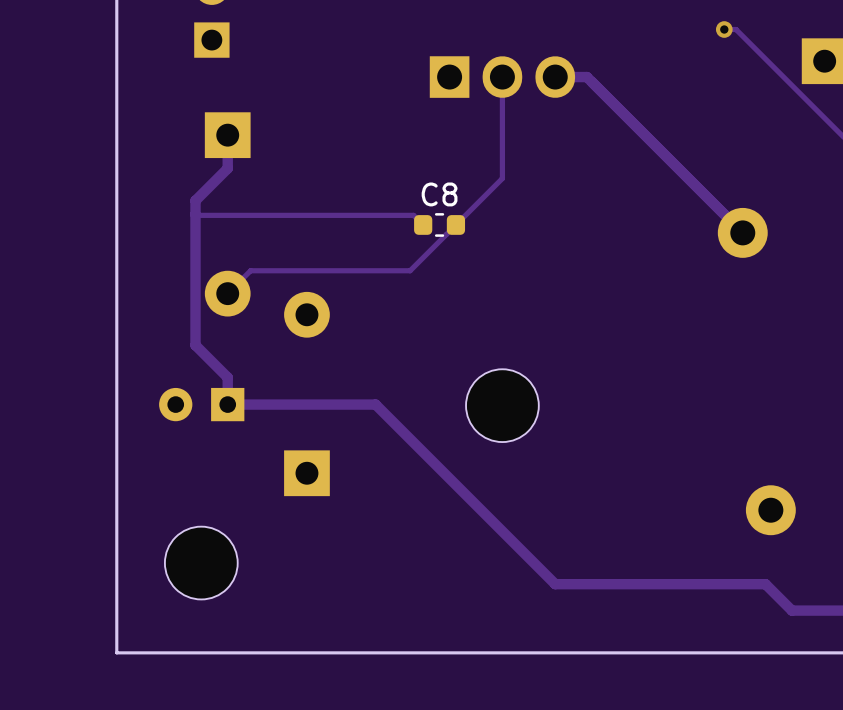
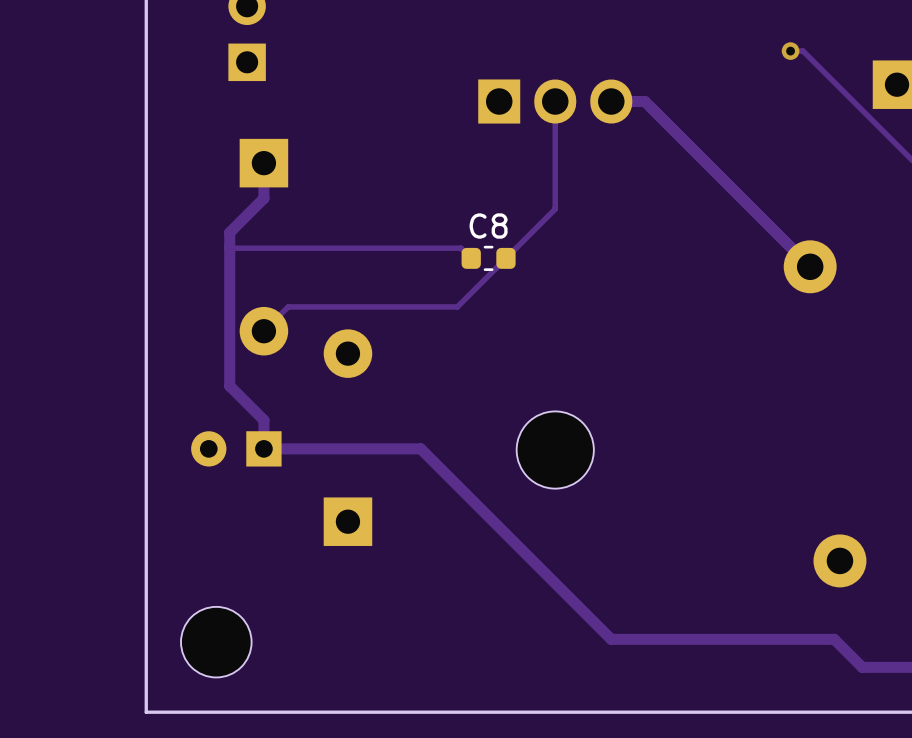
part: (201, 563) -> none
part: none -> (216, 642)

